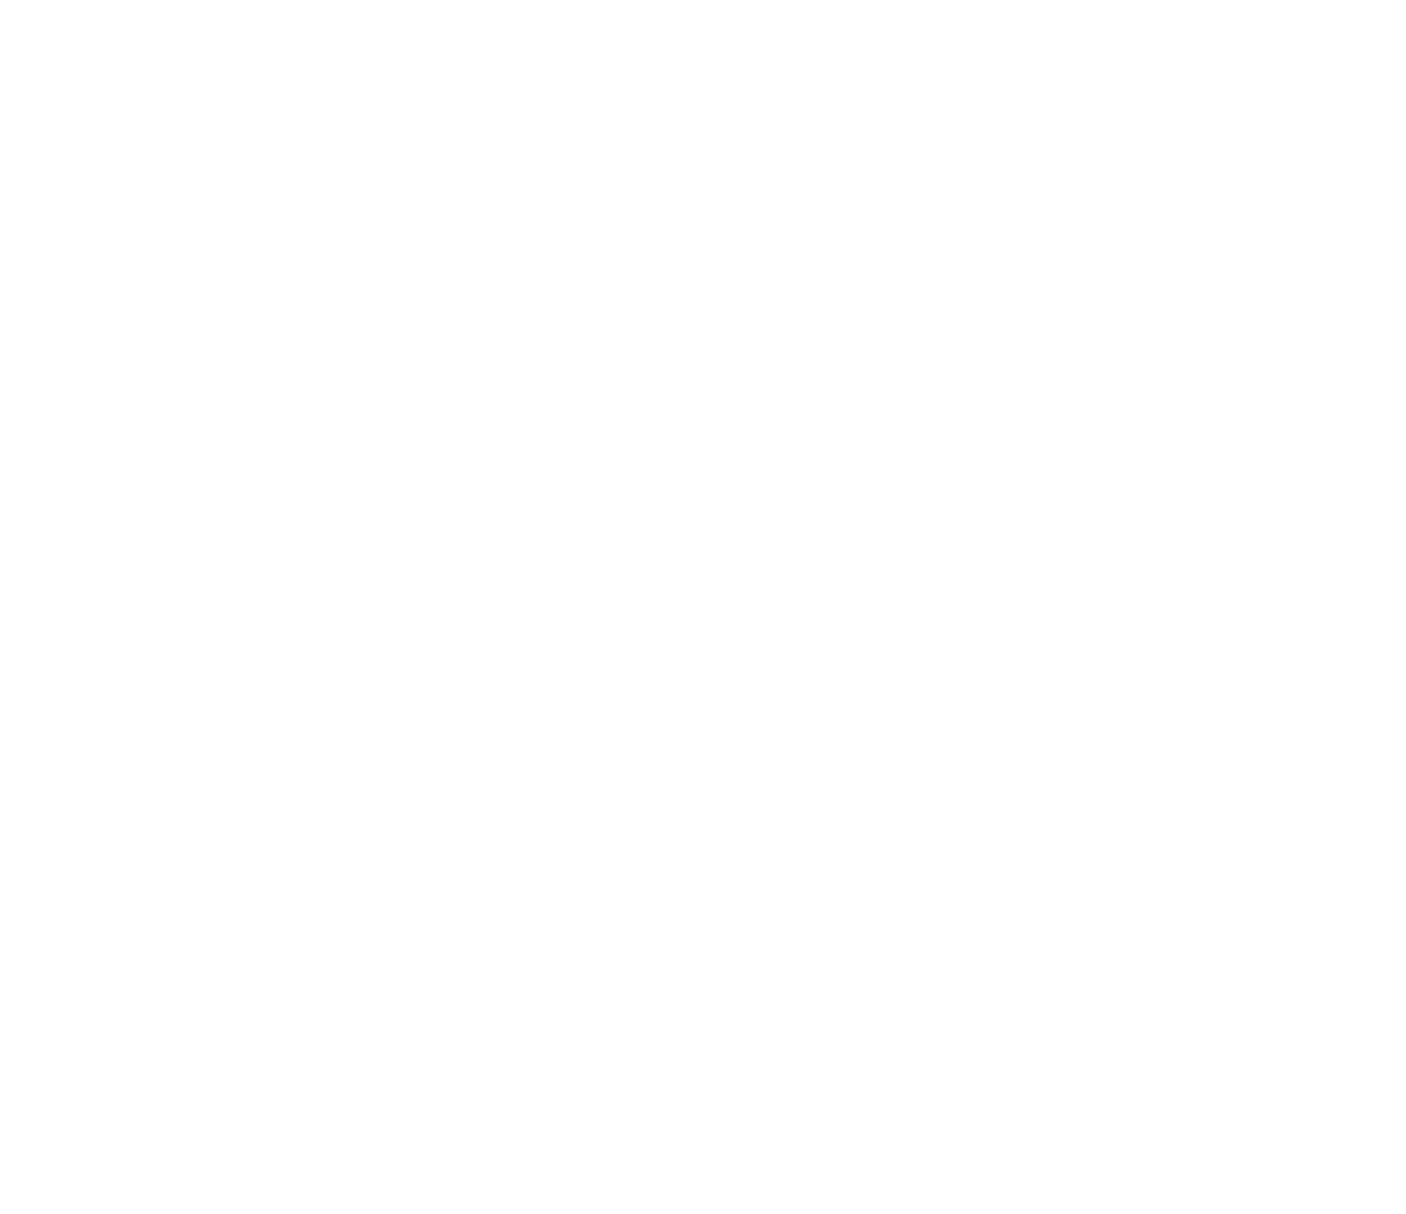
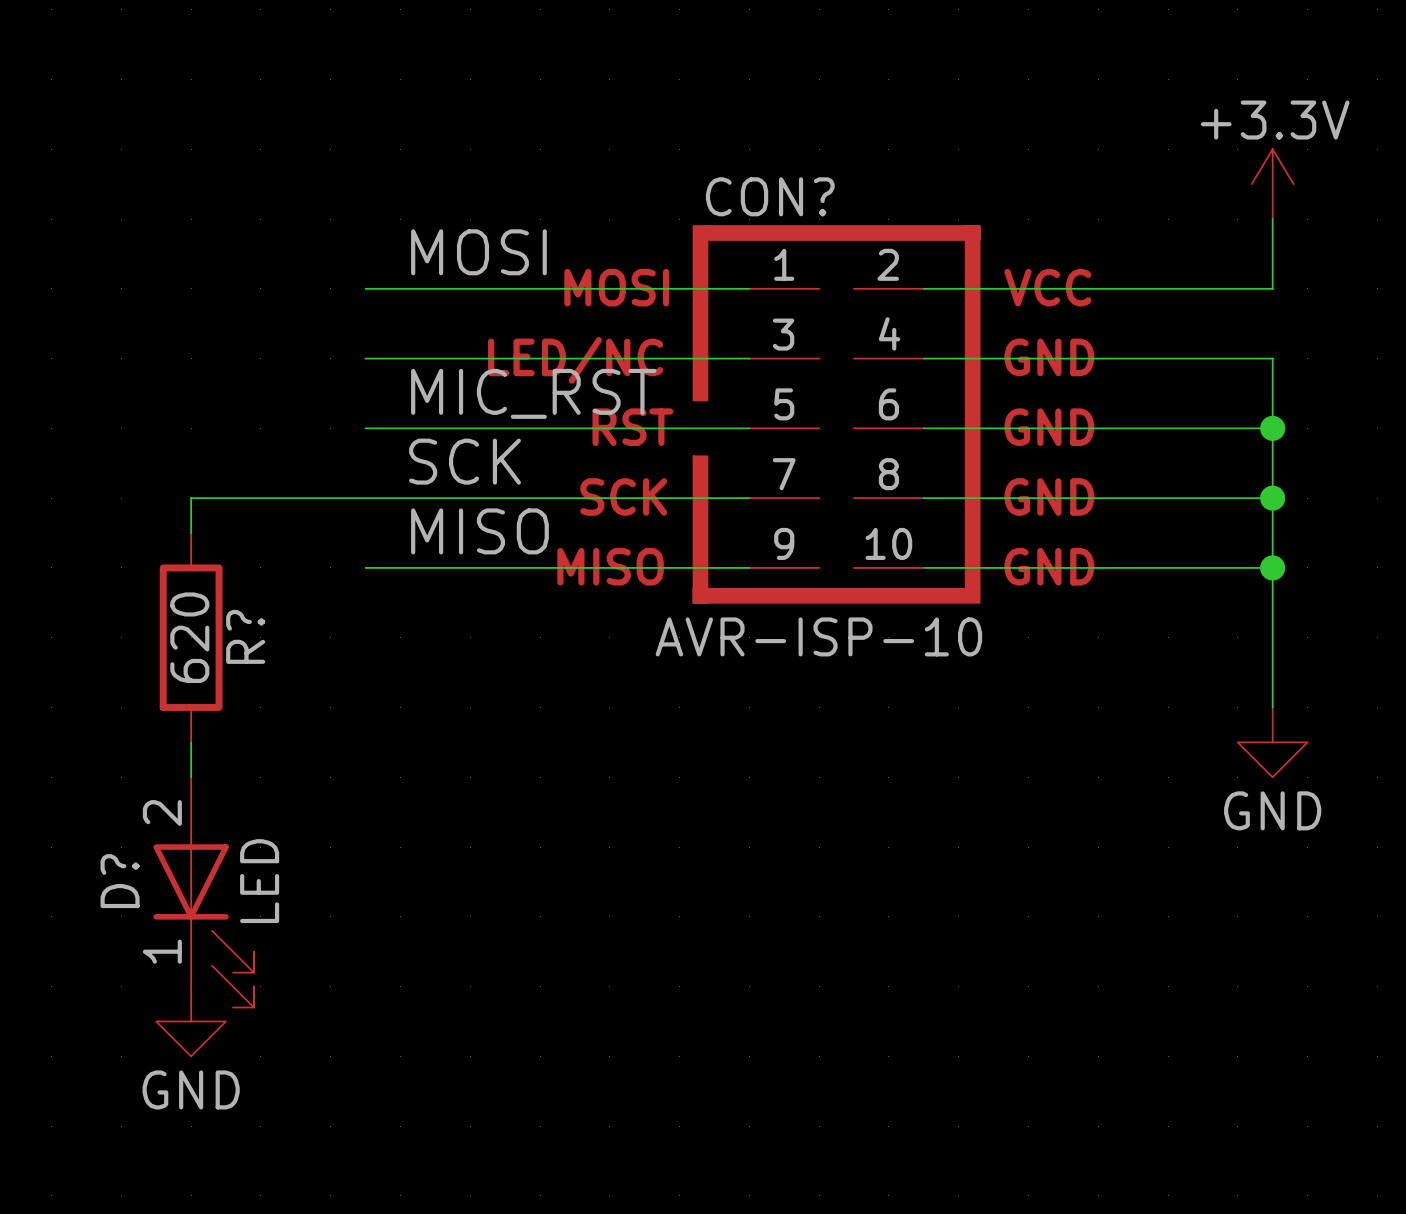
power symbol: none -> +3.3V (1272, 184)
wire: none -> (1272, 219) (1272, 288) (923, 288)
label: none -> MOSI (478, 252)
wire: none -> (365, 288) (749, 288)
wire: none -> (365, 358) (749, 358)
wire: none -> (923, 358) (1272, 358) (1272, 707)
label: none -> MIC_RST (533, 393)
CON?: none -> AVR-ISP-10 (836, 414)
wire: none -> (365, 428) (749, 428)
wire: none -> (923, 428) (1272, 428)
junction: none -> (1272, 428)
label: none -> SCK (465, 461)
wire: none -> (749, 498) (191, 498) (191, 533)
wire: none -> (923, 498) (1272, 498)
junction: none -> (1272, 498)
label: none -> MISO (479, 531)
wire: none -> (365, 567) (749, 567)
wire: none -> (923, 567) (1272, 567)
junction: none -> (1272, 567)
R?: none -> 620 (191, 637)
wire: none -> (191, 742) (191, 777)
power symbol: none -> GND (1272, 742)
D?: none -> LED (203, 892)
power symbol: none -> GND (191, 1021)

